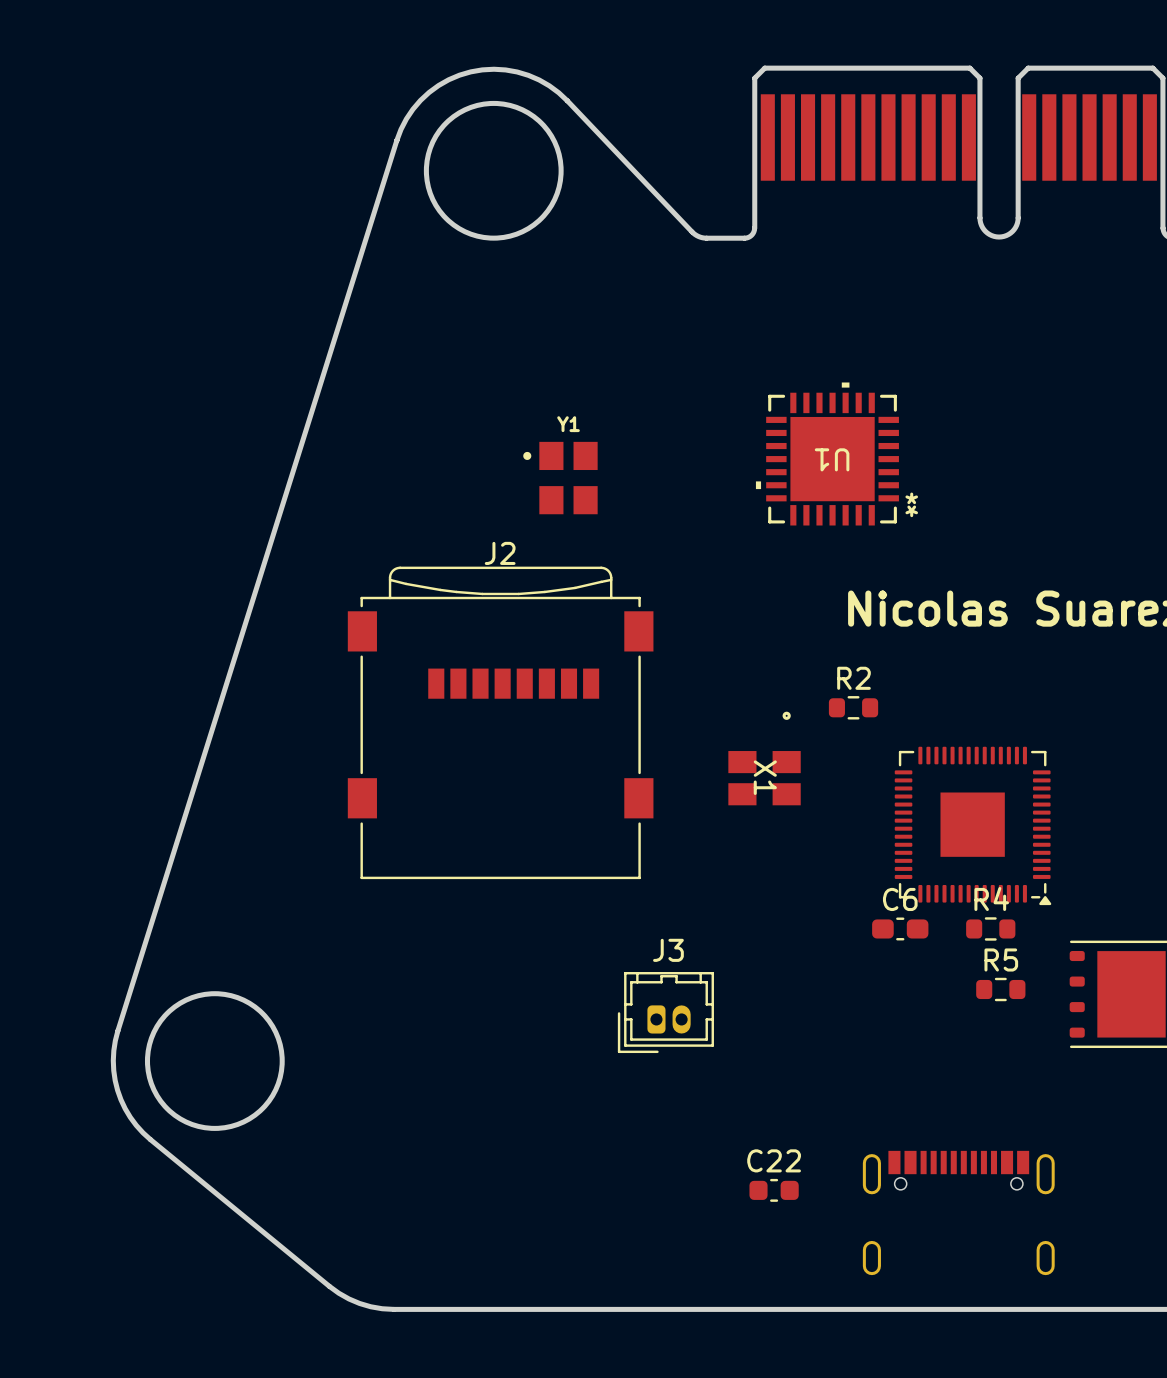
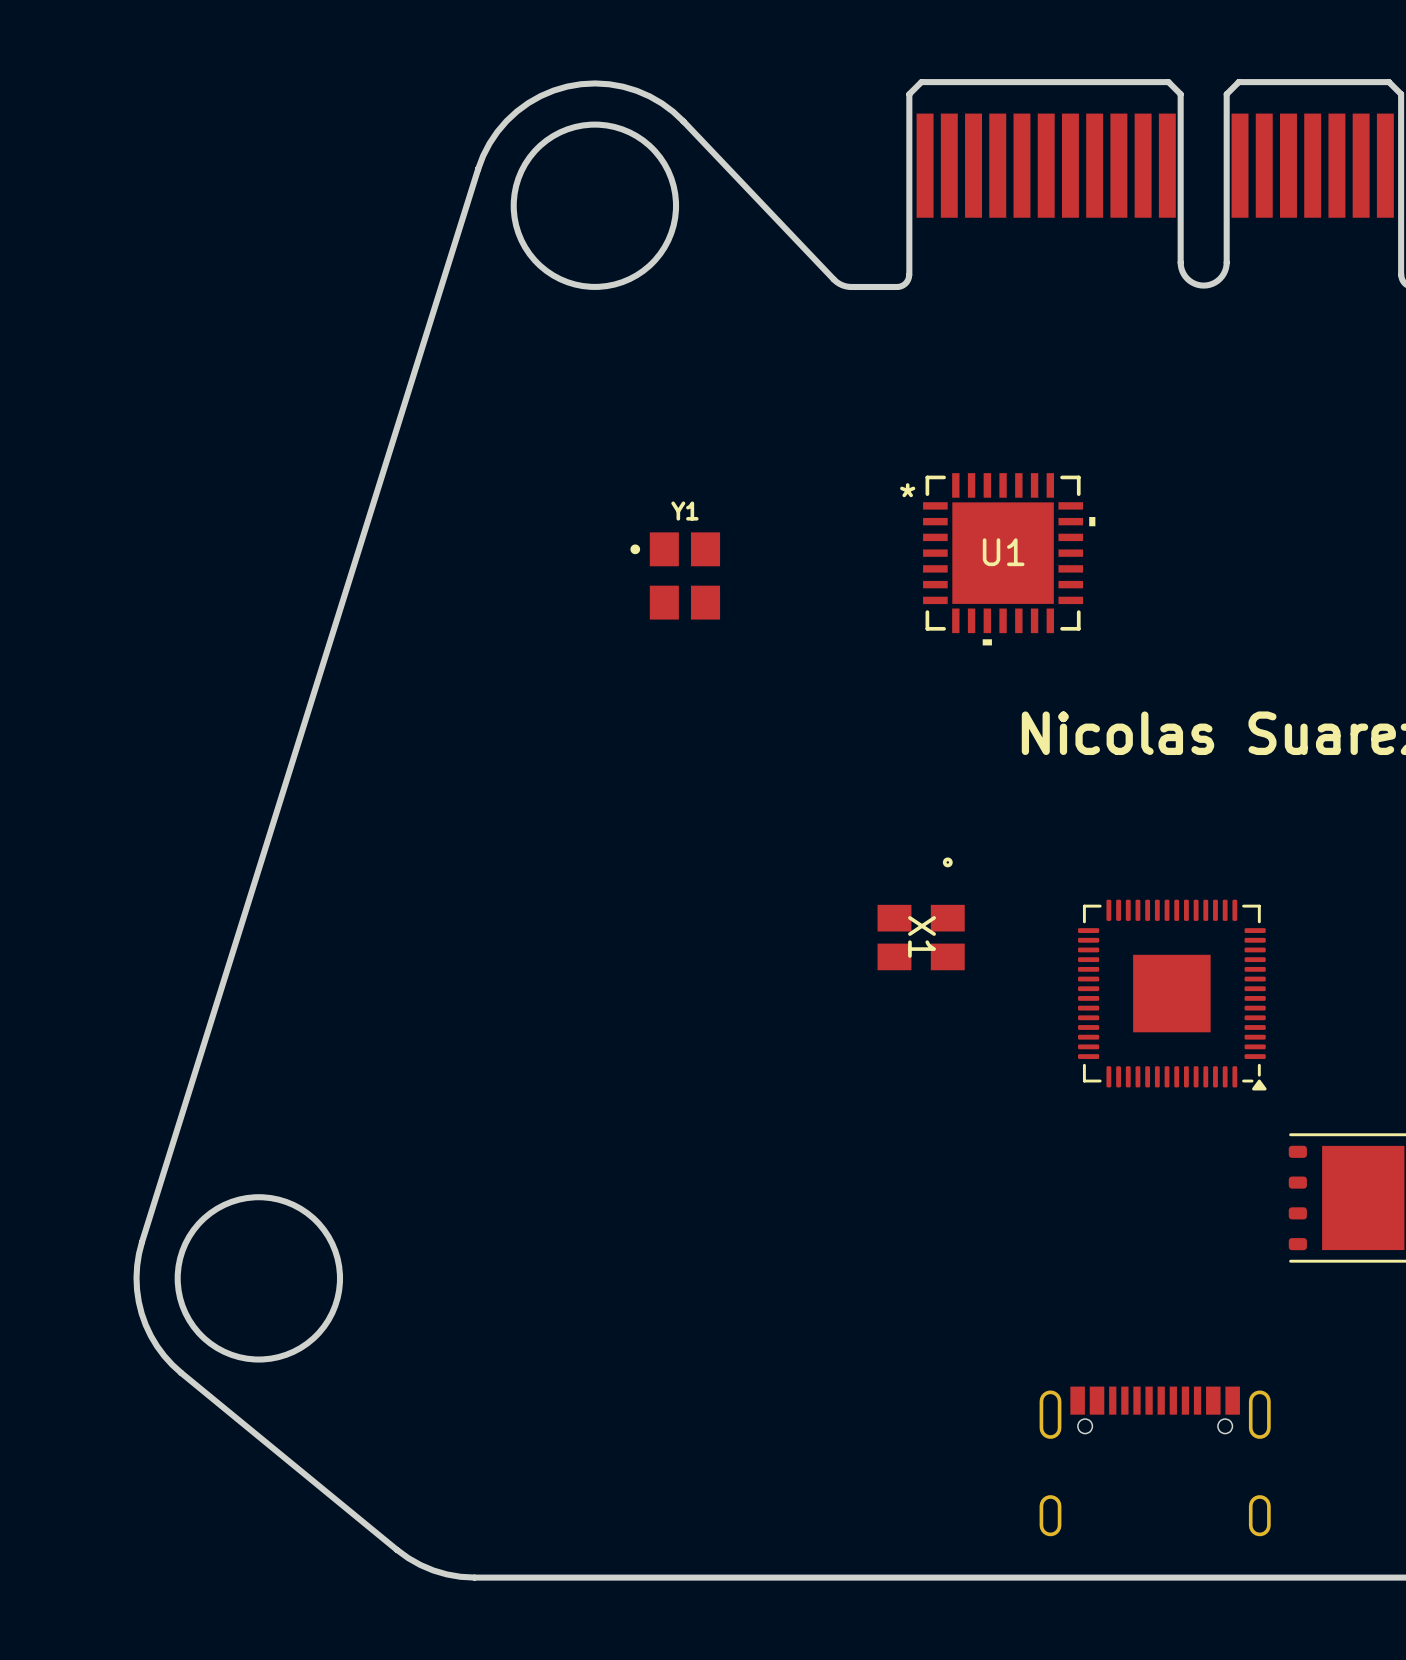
U1 rotation: 0° (827, 453) -> 180° (1009, 559)
R2: (853, 707) -> none
J2: (500, 722) -> none
C6: (900, 928) -> none
R4: (990, 928) -> none
R5: (1000, 989) -> none
J3: (665, 1012) -> none
C22: (774, 1190) -> none

